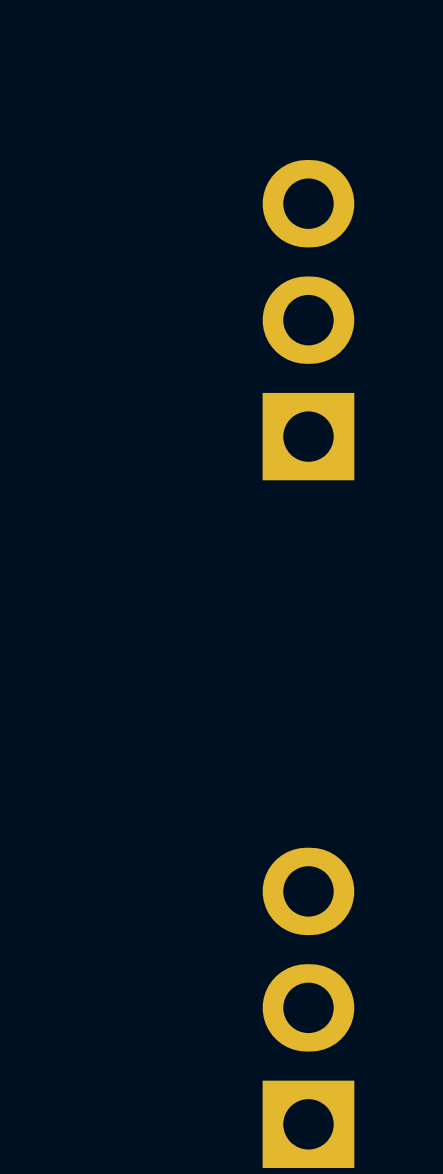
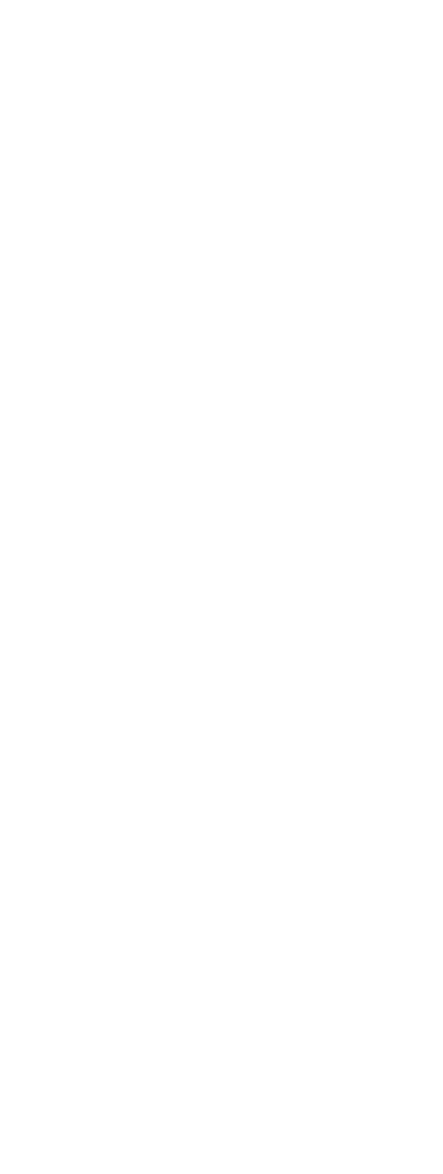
part: (308, 320) -> none
part: (308, 1007) -> none

